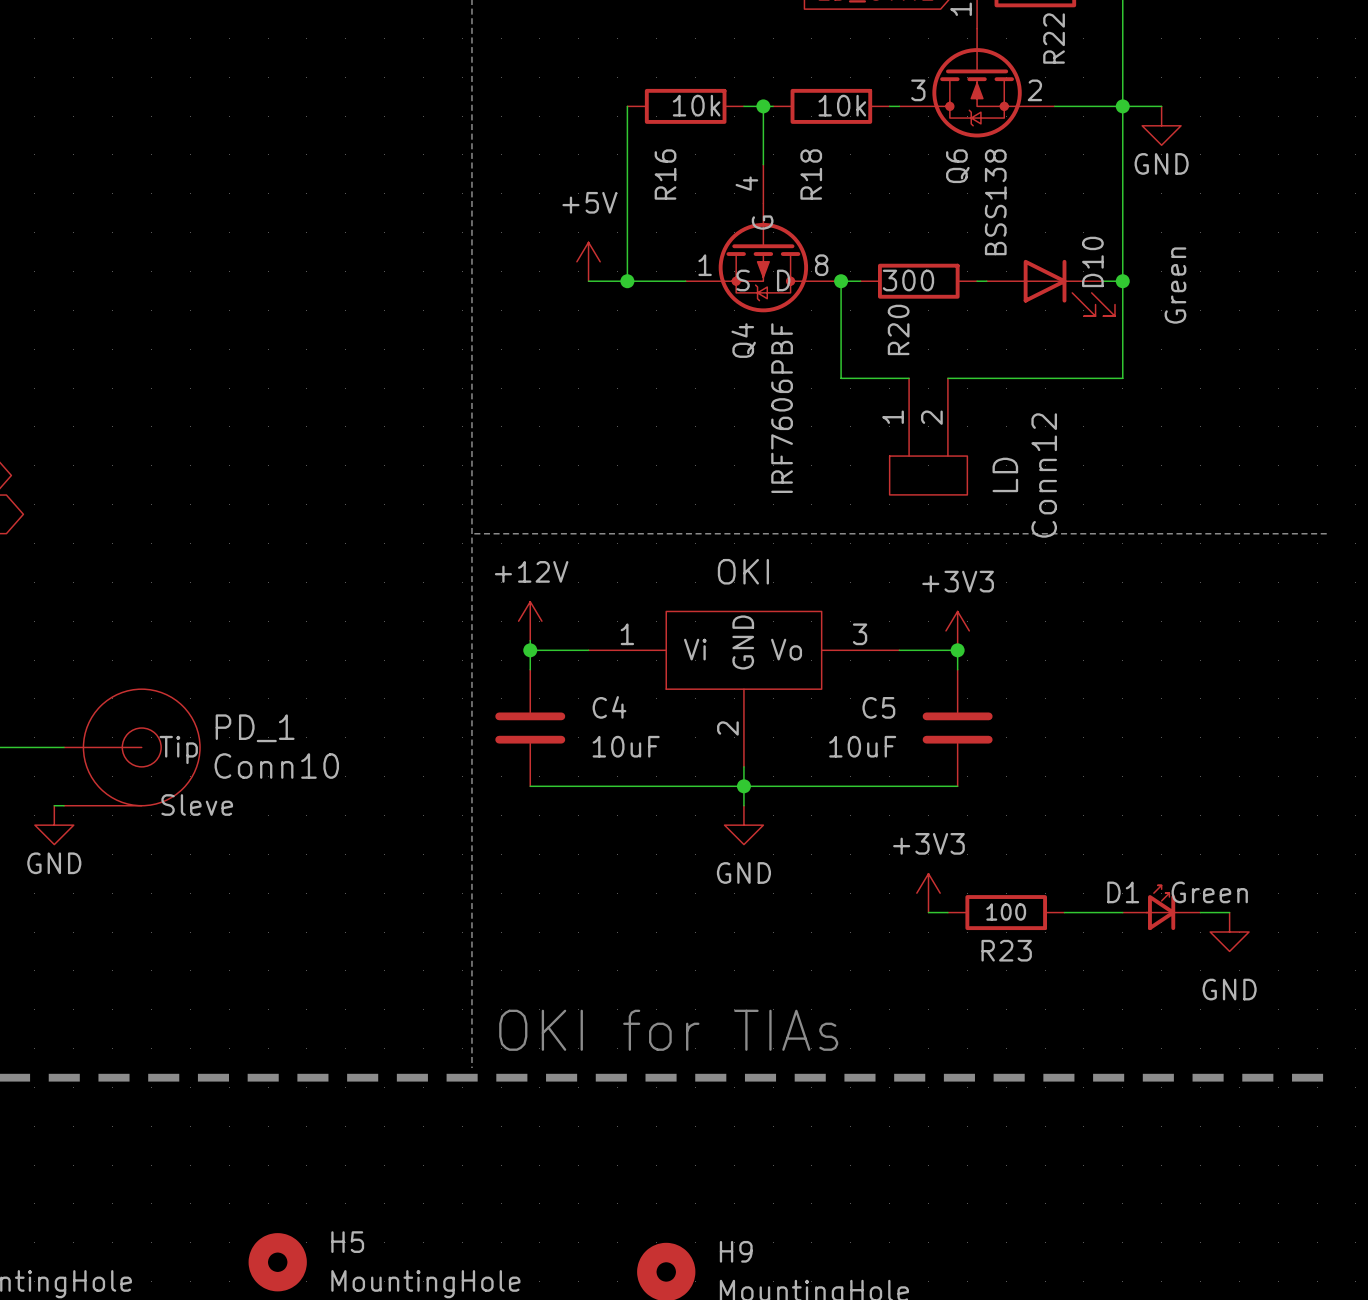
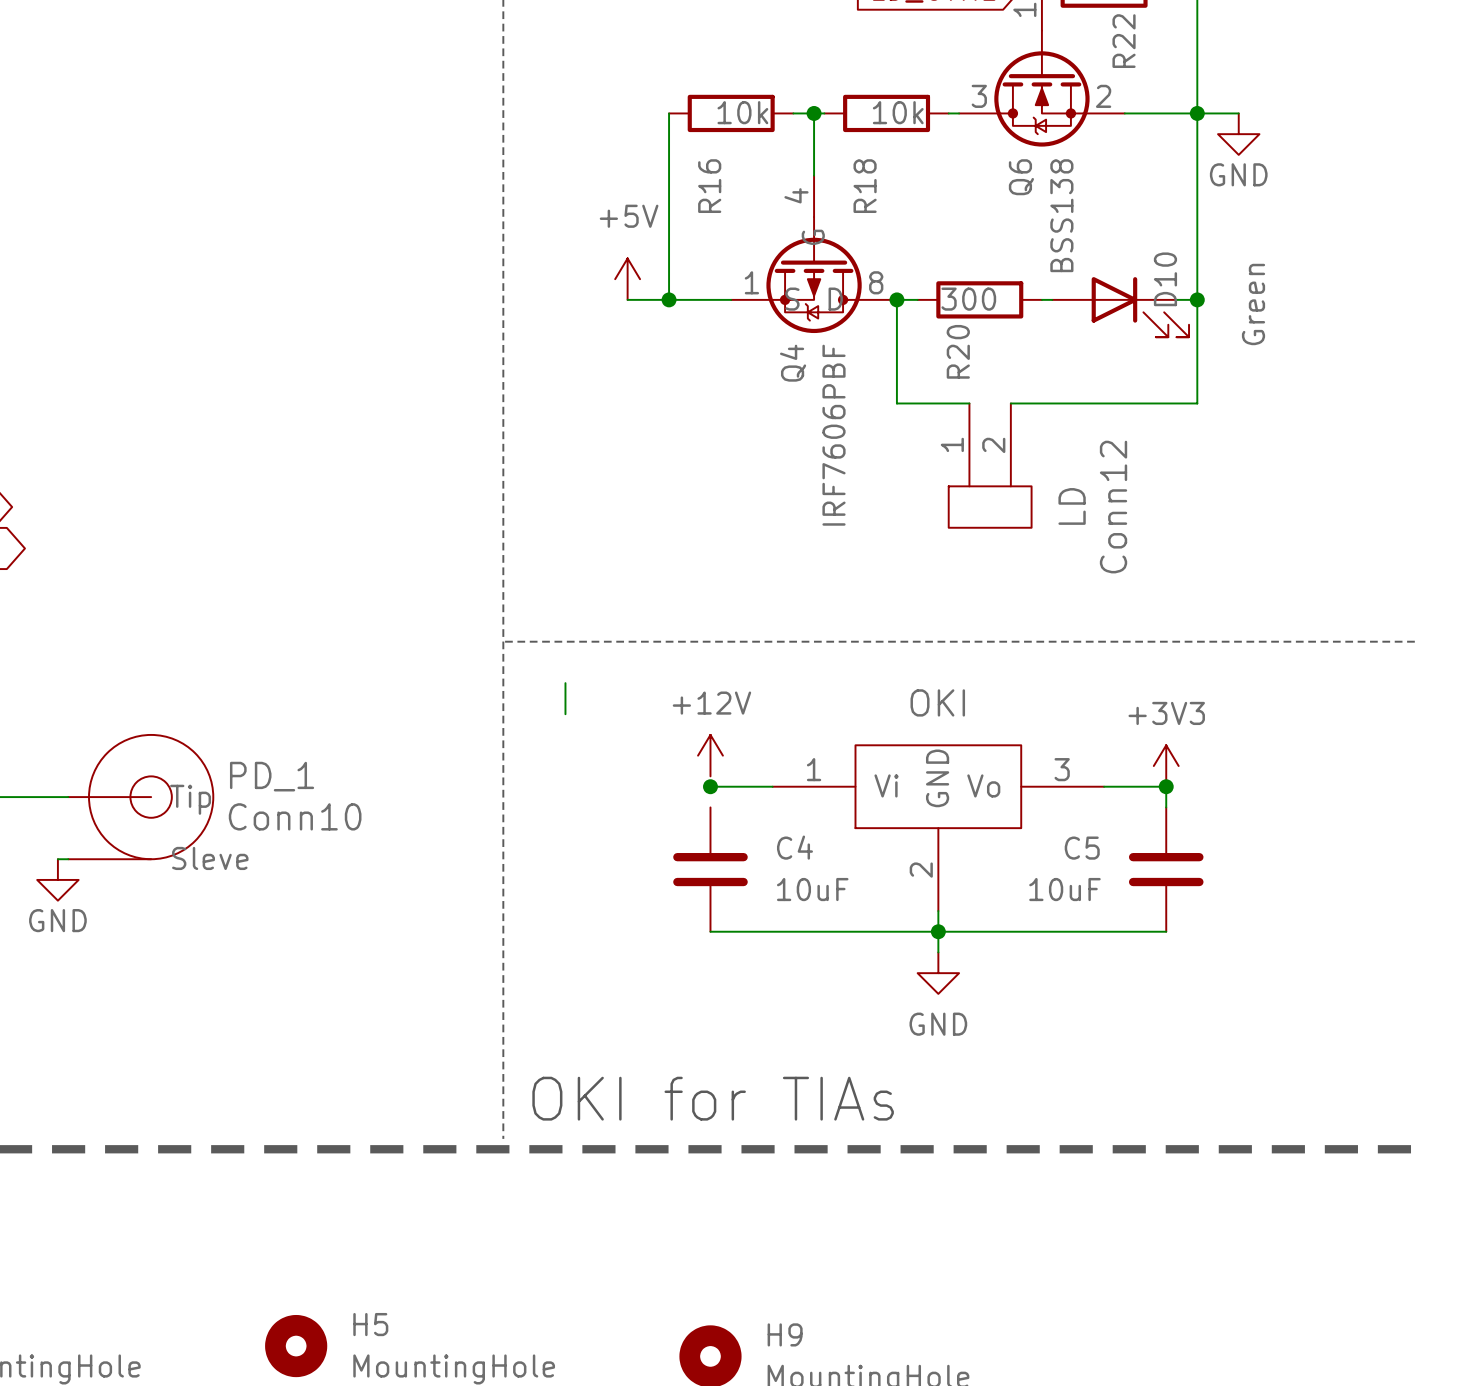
line: (471, 533) (1326, 533) -> (503, 641) (1414, 641)
power symbol position: +12V (530, 621) -> +12V (710, 755)
power symbol: +3V3 (957, 630) -> none
wire: (530, 650) (588, 650) -> (710, 786) (772, 786)
junction: (530, 650) -> none
wire: (899, 650) (957, 650) (957, 669) -> (1104, 786) (1166, 786) (1166, 807)
junction: (957, 650) -> none
part position: (743, 689) -> (938, 828)
power symbol: none -> +3V3 (1166, 766)
C4 position: (530, 728) -> (710, 869)
C5 position: (957, 728) -> (1166, 869)
junction: none -> (710, 786)
junction: none -> (1166, 786)
wire: (743, 766) (743, 805) -> (938, 911) (938, 952)
wire: (530, 786) (957, 786) -> (710, 931) (1166, 931)
junction: (743, 786) -> none
power symbol position: GND (743, 825) -> GND (938, 973)
junction: none -> (938, 931)
power symbol: +3V3 (928, 893) -> none
D1: Green (1161, 907) -> none
wire: (928, 912) (947, 912) -> none
R23: 100 (1006, 912) -> none
wire: (1064, 912) (1122, 912) -> none
wire: (1200, 912) (1229, 912) -> none
power symbol: GND (1229, 932) -> none

